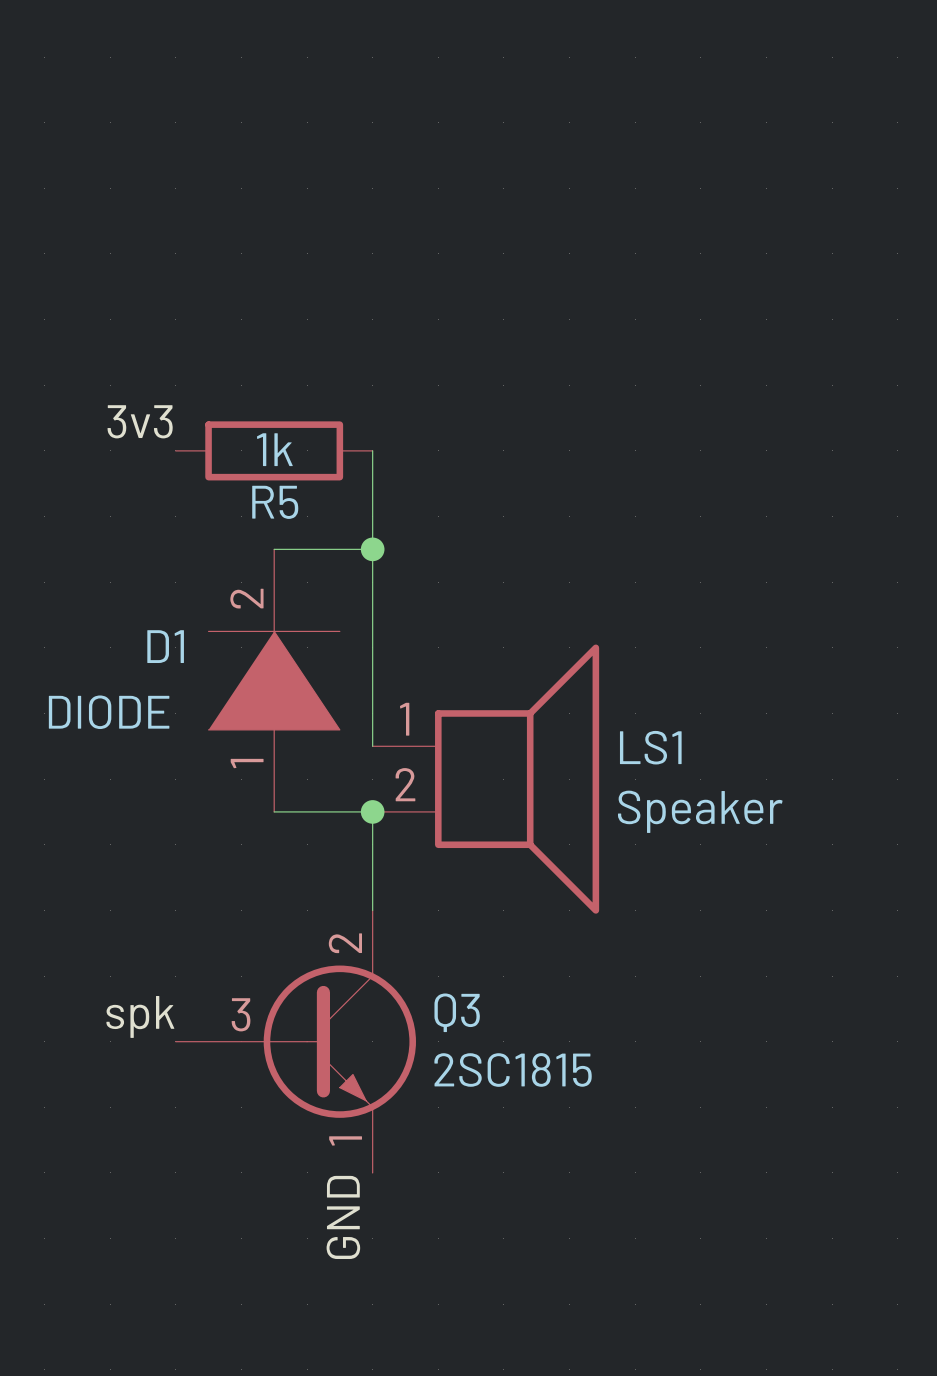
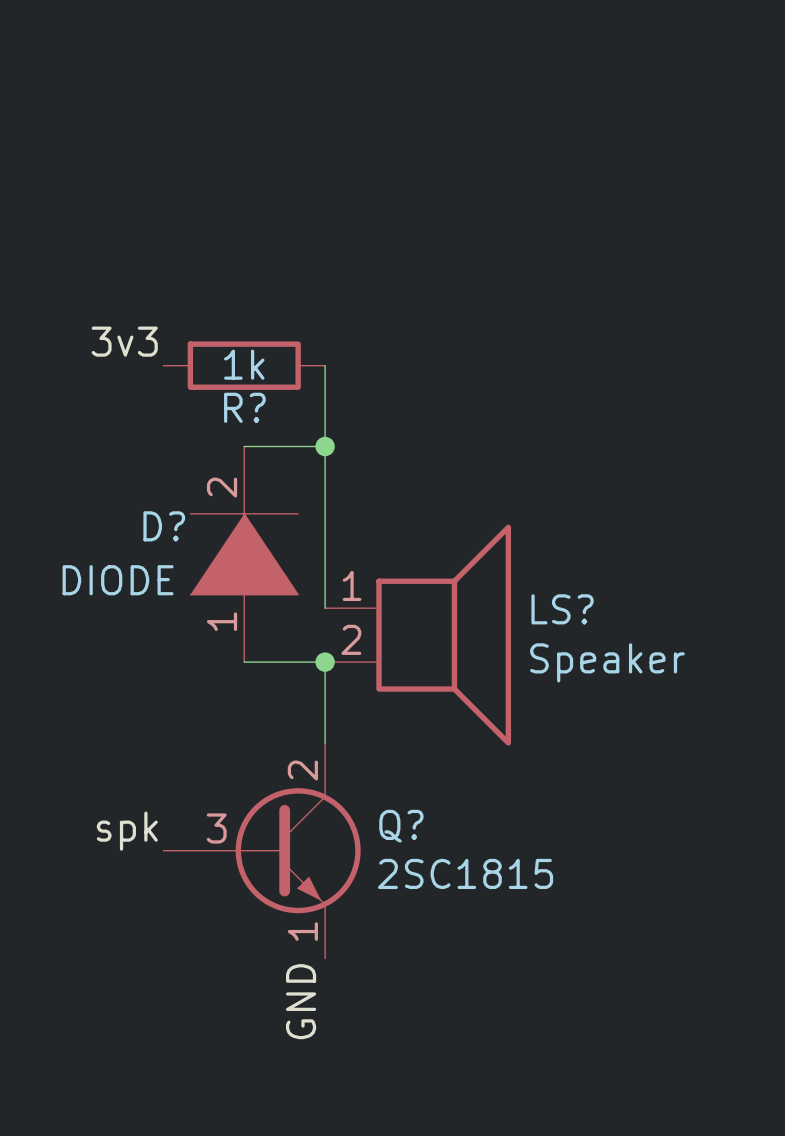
R5 name: R5 (275, 502) -> R? (244, 407)
D1 name: D1 (165, 646) -> D? (164, 526)
LS1 name: LS1 (650, 747) -> LS? (562, 609)
Q3 name: Q3 (457, 1012) -> Q? (401, 826)

